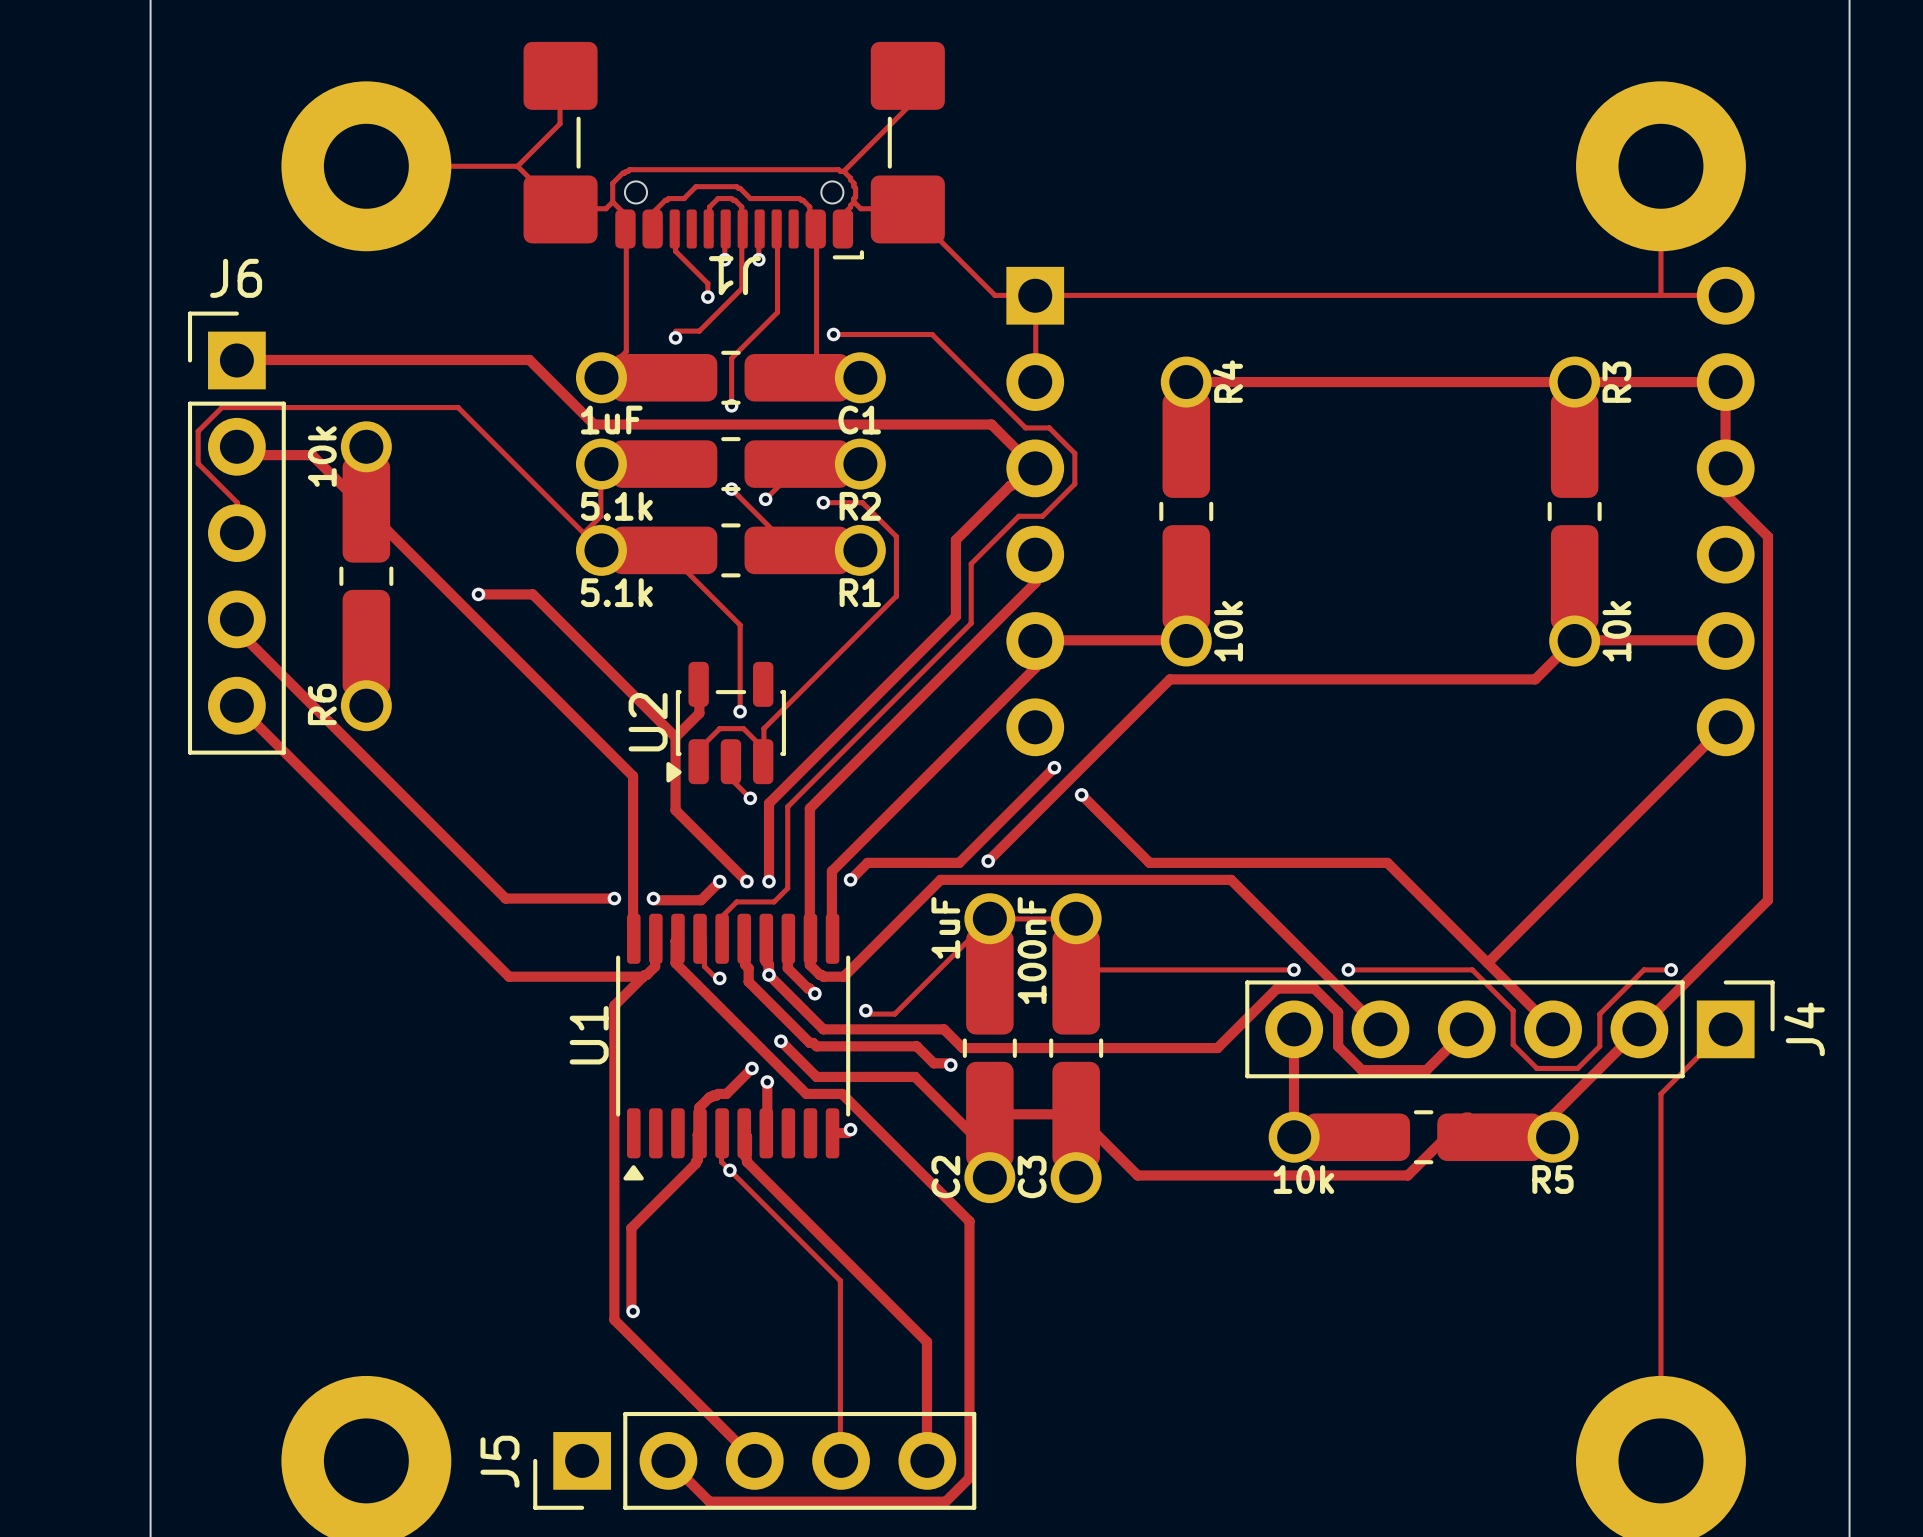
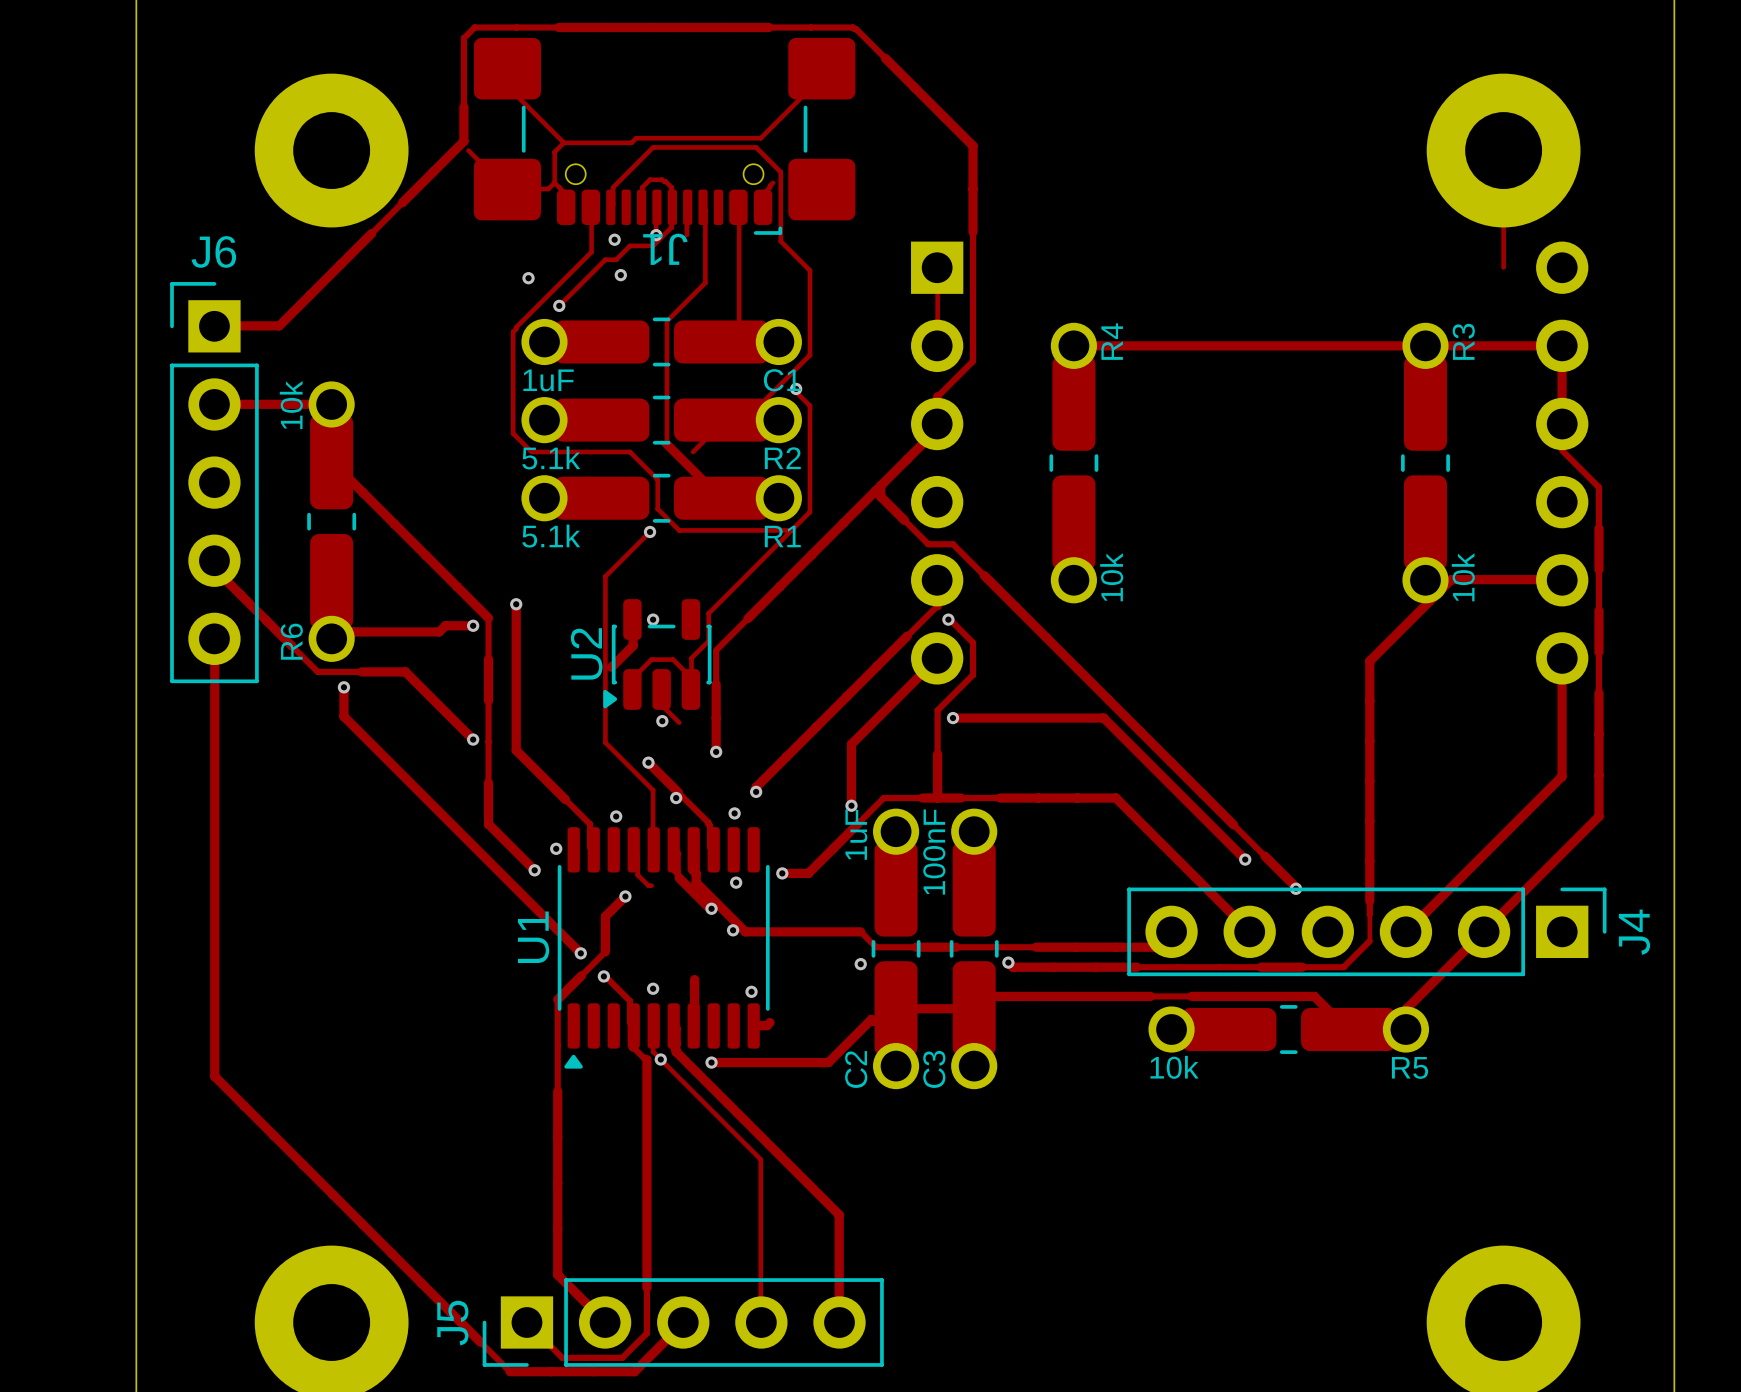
track: (908, 84) (908, 106) (843, 171) (838, 169) (629, 169) (622, 173) (612, 183) -> (822, 76) (760, 138) (636, 138) (631, 142) (563, 142)
track: (560, 94) (560, 123) (517, 166) (366, 166) -> (506, 85) (563, 142)
track: none -> (563, 142) (554, 152) (554, 165)
track: (850, 178) (855, 188) (853, 201) (860, 208) (908, 208) (994, 295) (1725, 295) -> (769, 161) (780, 172) (780, 241) (809, 270) (809, 355) (745, 419) (722, 419)
track: (626, 229) (626, 351) (600, 376) -> none
track: (653, 229) (653, 212) (665, 200) (684, 198) (695, 186) (736, 186) (750, 198) (799, 198) (809, 207) (809, 222) (816, 229) -> (591, 207) (591, 252) (513, 332) (513, 433) (531, 451) (630, 451) (657, 479) (657, 508) (679, 530) (791, 530)
track: (673, 229) (675, 230) (675, 251) (707, 283) (707, 297) -> (610, 207) (613, 204) (613, 187) (653, 147) (756, 147) (763, 155)
track: (777, 230) (777, 312) (731, 358) (731, 405) -> (703, 208) (705, 210) (705, 282) (666, 321) (666, 441) (722, 498)
track: (741, 251) (741, 288) (699, 331) (675, 331) -> (671, 227) (653, 245) (630, 245) (616, 259) (605, 259) (559, 305)
via: (758, 259) -> none
via: none -> (614, 239)
via: (707, 297) -> none
via: none -> (620, 275)
via: none -> (528, 278)
track: (833, 334) (932, 334) (1025, 427) (1049, 427) (1074, 453) (1074, 484) (1042, 516) (1018, 516) (971, 563) (971, 623) (787, 806) (787, 888) (774, 901) (736, 901) (721, 917) -> (650, 531) (605, 576) (605, 742) (653, 790) (653, 830)
via: (833, 334) -> none
via: none -> (559, 305)
via: (675, 337) -> none
track: (308, 359) (529, 359) (594, 424) (991, 424) (1035, 468) -> (279, 325) (463, 141) (463, 38) (474, 27) (853, 27) (973, 145) (973, 361) (937, 396) (937, 424)
via: (731, 405) -> none
via: none -> (796, 388)
track: none -> (214, 404) (331, 404)
track: (245, 455) (311, 455) (366, 509) -> none
track: (600, 463) (600, 516) (583, 533) -> none
track: (1725, 468) (1725, 494) (1768, 536) (1768, 900) (1766, 901) -> (1562, 450) (1598, 487) (1598, 816)
track: none -> (939, 427) (716, 650) (716, 751)
track: (1011, 485) (955, 540) (955, 616) (769, 803) (769, 881) -> none
via: (731, 489) -> none
via: (765, 499) -> none
track: (823, 502) (862, 502) (896, 536) (896, 596) (763, 728) -> (796, 392) (809, 405) (809, 511) (708, 613) (708, 641) (691, 659)
via: (823, 502) -> none
track: (237, 533) (237, 502) (198, 463) (198, 431) (221, 407) (458, 407) (600, 550) -> none
track: none -> (880, 485) (880, 496) (928, 544) (953, 544) (1295, 887)
track: (664, 550) (740, 625) (740, 711) -> none
track: (1035, 555) (1035, 582) (809, 808) (809, 964) (823, 976) (843, 976) (940, 879) (1231, 879) (1232, 881) -> (782, 873) (808, 873) (883, 798) (1116, 798)
via: none -> (650, 531)
track: (478, 594) (532, 594) (675, 737) (675, 810) (746, 881) -> none
via: (478, 594) -> none
track: (237, 619) (237, 630) (505, 898) (614, 898) -> none
track: none -> (214, 568) (317, 671) (405, 671) (473, 739)
track: (1035, 640) (1186, 640) -> none
track: (1603, 640) (1574, 640) (1535, 679) (1169, 679) (988, 861) -> none
track: none -> (516, 604) (516, 750) (590, 824) (590, 847) (593, 850)
via: none -> (516, 604)
track: (1035, 667) (831, 871) (831, 939) -> (937, 604) (756, 787) (756, 791)
track: (539, 682) (633, 776) (633, 939) -> (488, 618) (488, 824) (534, 870)
via: none -> (948, 619)
track: none -> (949, 619) (973, 642) (973, 675) (937, 710) (937, 798)
track: none -> (473, 625) (445, 625) (439, 631) (353, 631) (347, 638) (331, 638)
via: none -> (473, 625)
track: (237, 704) (509, 976) (643, 976) -> none
via position: (740, 711) -> (653, 619)
track: none -> (937, 658) (851, 744) (851, 805)
track: (1723, 726) (1487, 963) -> none
track: none -> (343, 687) (343, 716) (580, 953)
via: none -> (343, 687)
track: (1054, 767) (959, 862) (867, 862) (850, 879) -> none
via: (1054, 767) -> none
track: none -> (953, 718) (1103, 718) (1245, 859)
via: none -> (953, 718)
track: (1081, 794) (1149, 862) (1387, 862) (1553, 1029) -> (1562, 658) (1562, 776) (1406, 931)
via: (1081, 794) -> none
via position: (750, 798) -> (662, 721)
via: none -> (473, 739)
via: none -> (716, 751)
via: none -> (648, 762)
via: (988, 861) -> none
via position: (850, 879) -> (756, 791)
track: (719, 881) (701, 900) (655, 900) -> none
via: (719, 881) -> none
via: (769, 881) -> none
via: none -> (851, 805)
via: (614, 898) -> none
via: (653, 898) -> none
via: none -> (734, 813)
via: none -> (616, 816)
track: (1076, 918) (989, 918) (894, 1014) (869, 1014) (865, 1010) -> none
via: none -> (556, 848)
track: (655, 939) (655, 966) (614, 1005) (614, 1319) (755, 1460) -> (214, 638) (214, 1076) (510, 1371) (634, 1371) (683, 1322)
track: (677, 939) (675, 941) (675, 963) (806, 1093) (842, 1093) (969, 1221) (969, 1477) (945, 1501) (709, 1501) (668, 1460) -> (625, 896) (605, 916) (605, 951) (557, 999) (557, 1274) (605, 1322)
track: (787, 939) (787, 968) (814, 993) -> (713, 850) (710, 847) (708, 822) (648, 762)
track: (745, 941) (745, 964) (748, 968) (748, 981) (809, 1042) (813, 1042) (816, 1046) (916, 1046) (933, 1063) (949, 1063) -> (674, 851) (676, 870) (679, 878) (710, 908)
via: none -> (534, 870)
via: none -> (782, 873)
track: (1293, 969) (1088, 969) (1076, 981) -> none
via: (1293, 969) -> none
track: (1348, 969) (1472, 969) (1513, 1010) -> (1451, 579) (1369, 661) (1369, 914)
via position: (1348, 969) -> (1245, 859)
track: (1671, 969) (1643, 969) (1599, 1014) (1599, 1046) (1577, 1068) (1536, 1068) (1513, 1044) (1513, 1039) -> (1008, 962) (1012, 967) (1343, 967) (1369, 941)
via: (1671, 969) -> none
via: (769, 975) -> none
via: none -> (736, 882)
via position: (719, 978) -> (625, 896)
via: none -> (1295, 888)
via: (814, 993) -> none
via: none -> (711, 908)
via: (865, 1010) -> none
via: none -> (733, 930)
track: (944, 1029) (962, 1048) (1217, 1048) (1277, 988) (1314, 988) (1338, 1012) (1338, 1046) (1361, 1070) (1426, 1070) (1467, 1029) -> (854, 931) (860, 931) (876, 947) (1156, 947) (1171, 931)
track: (1293, 1029) (1293, 1138) -> none
track: (1725, 1029) (1660, 1093) (1660, 1460) -> none
track: (780, 1041) (816, 1076) (915, 1076) (971, 1133) (976, 1127) -> (711, 1062) (828, 1062) (871, 1019) (883, 1021)
via: (780, 1041) -> none
via: none -> (580, 953)
via: none -> (1008, 962)
track: (752, 1068) (726, 1093) (718, 1093) (709, 1097) (699, 1107) (699, 1133) (697, 1134) (695, 1163) (631, 1228) (631, 1309) -> none
via: (752, 1068) -> none
via: none -> (603, 976)
track: none -> (605, 976) (630, 1001) (633, 1047) (646, 1059) (646, 1333) (622, 1357) (562, 1357) (526, 1322)
via: (767, 1082) -> none
via: none -> (653, 988)
via: none -> (751, 991)
track: (1076, 1114) (1137, 1175) (1407, 1175) (1465, 1117) (1468, 1117) -> (974, 1008) (986, 996) (1314, 996) (1329, 1011)
via: (850, 1129) -> none
via: none -> (711, 1062)
via: (633, 1311) -> none

